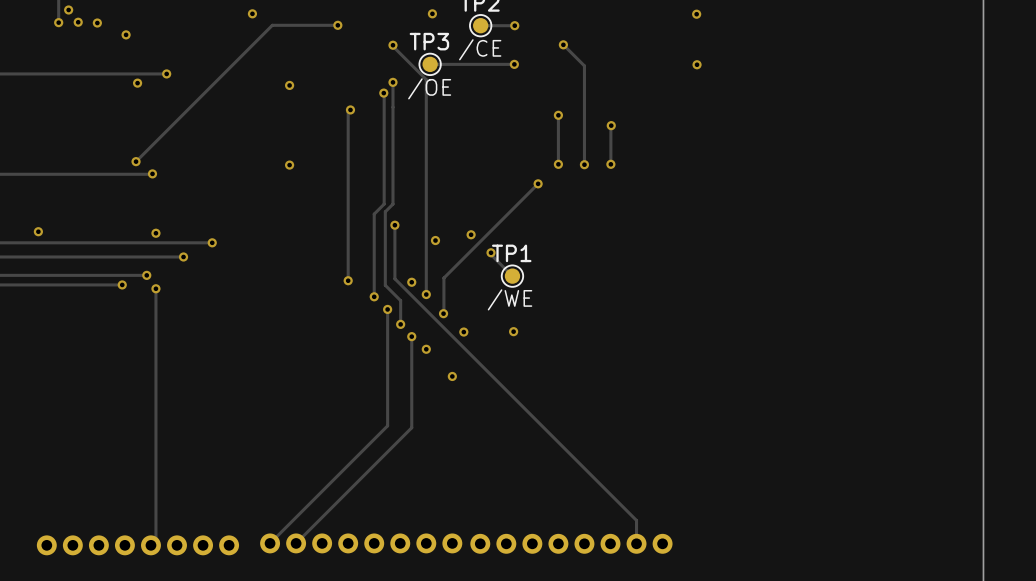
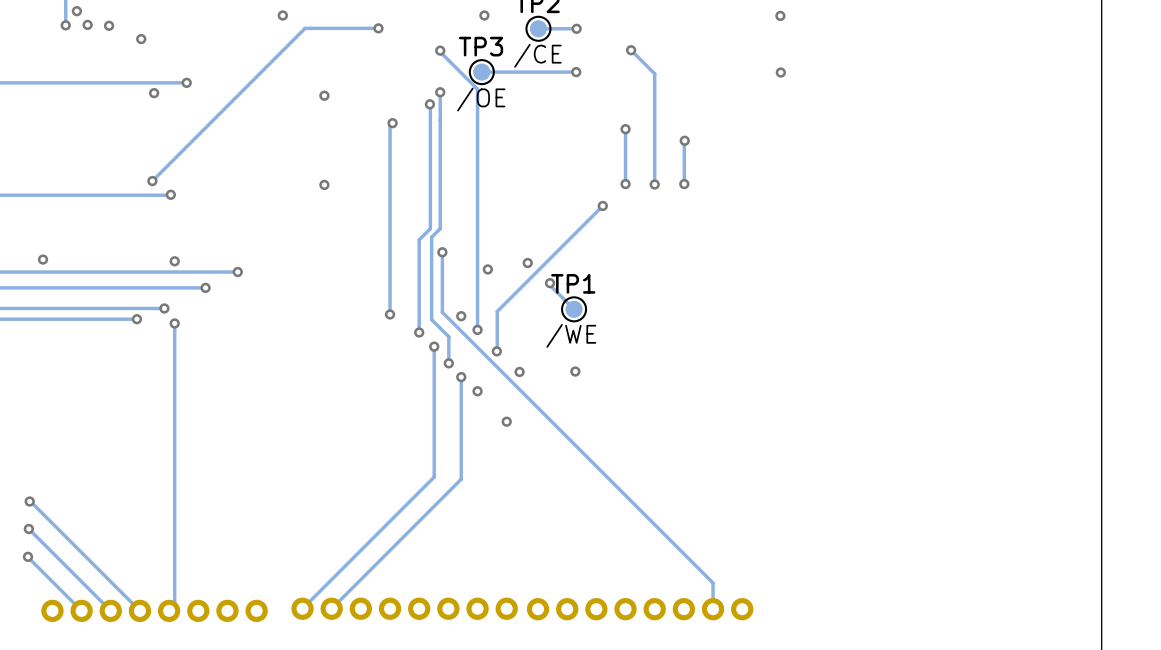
track: none -> (29, 501) (139, 610)
via: none -> (29, 501)
track: none -> (28, 528) (110, 610)
via: none -> (28, 528)
track: none -> (27, 556) (81, 610)
via: none -> (27, 556)

